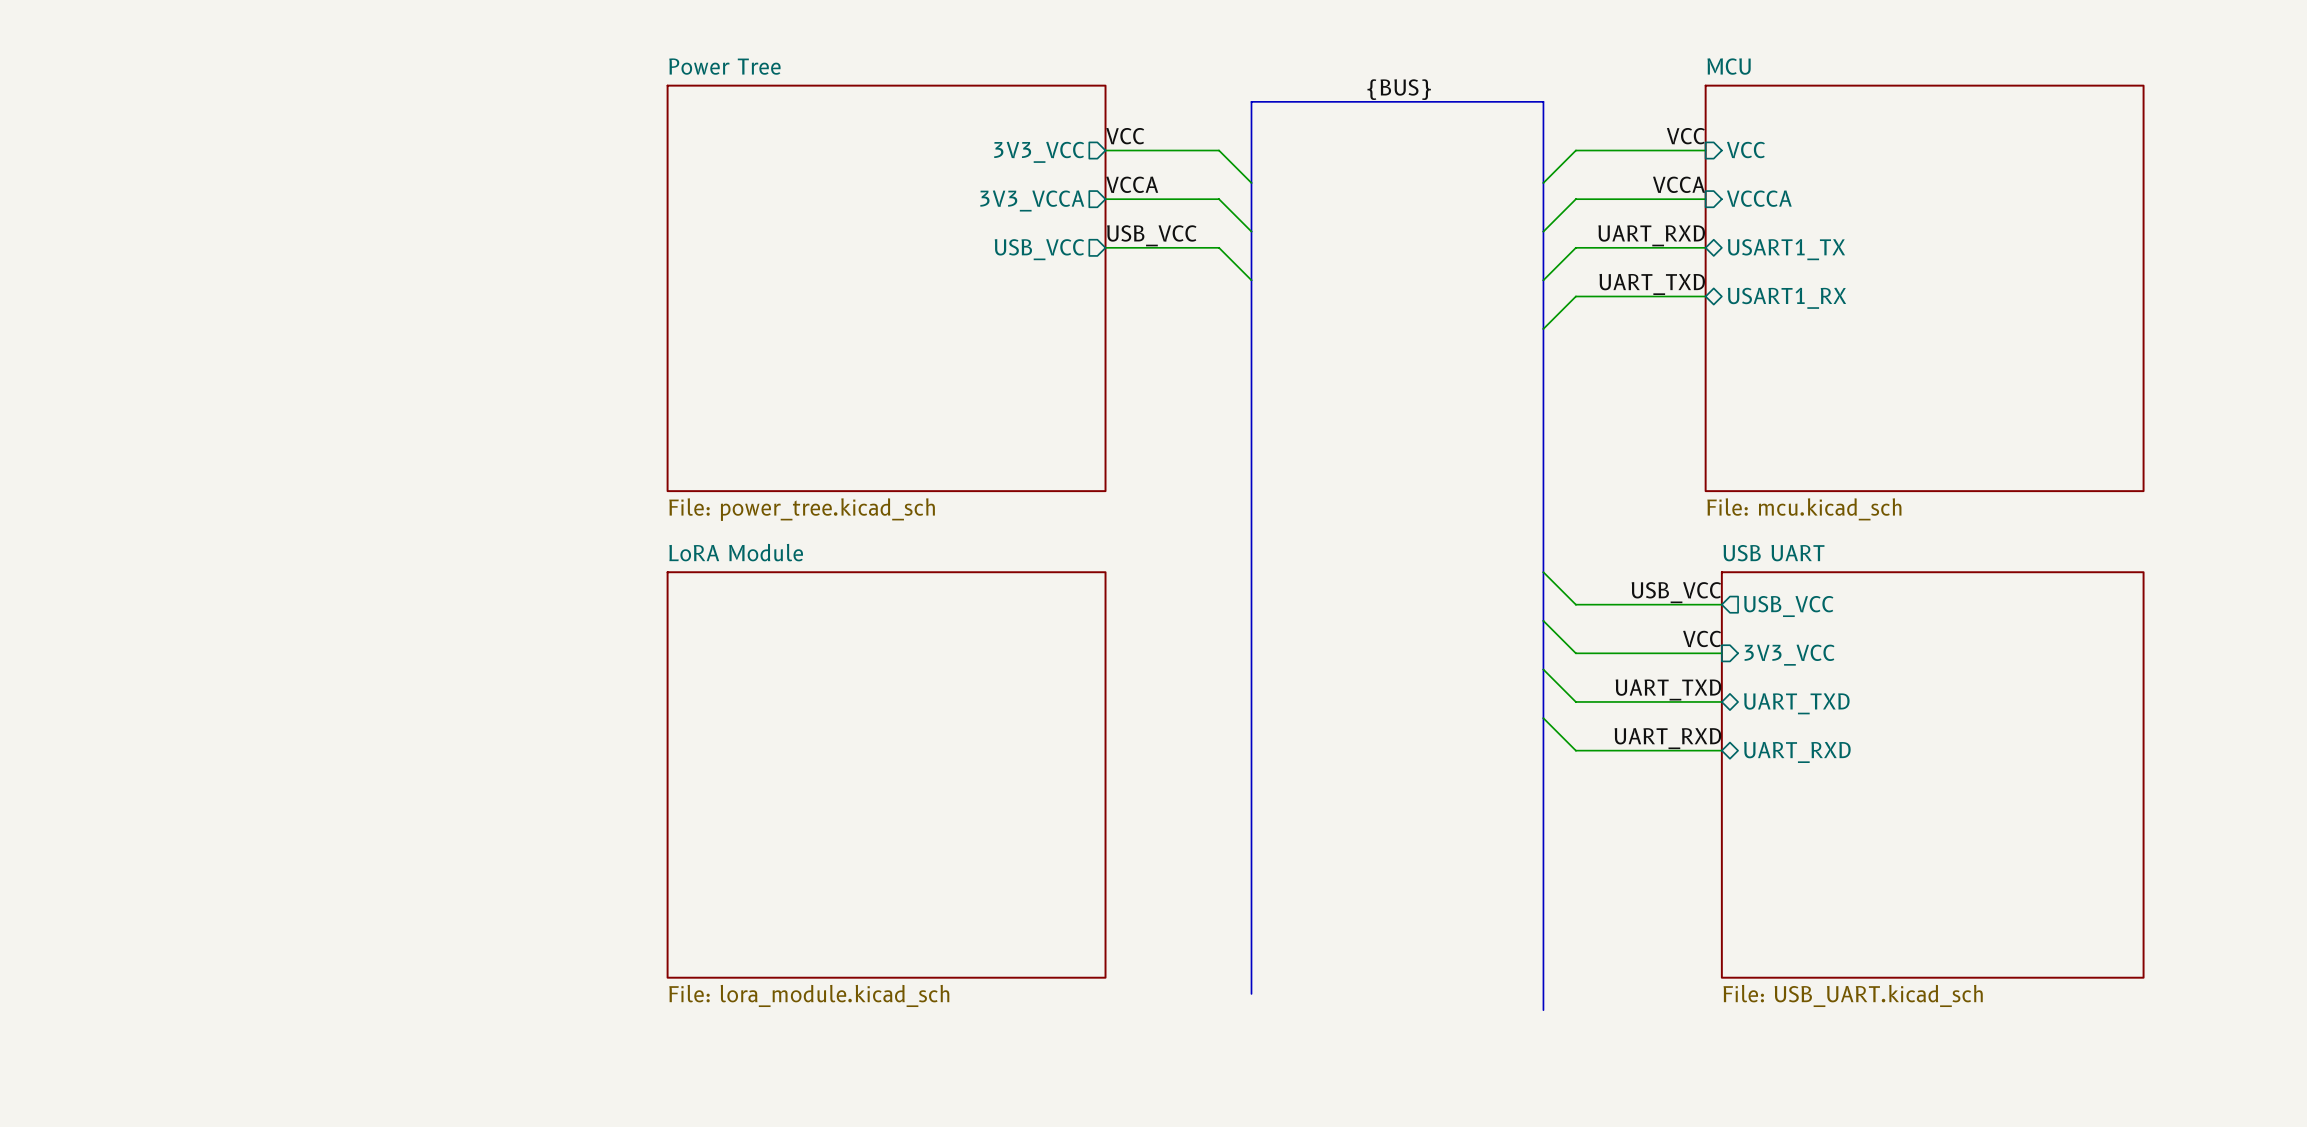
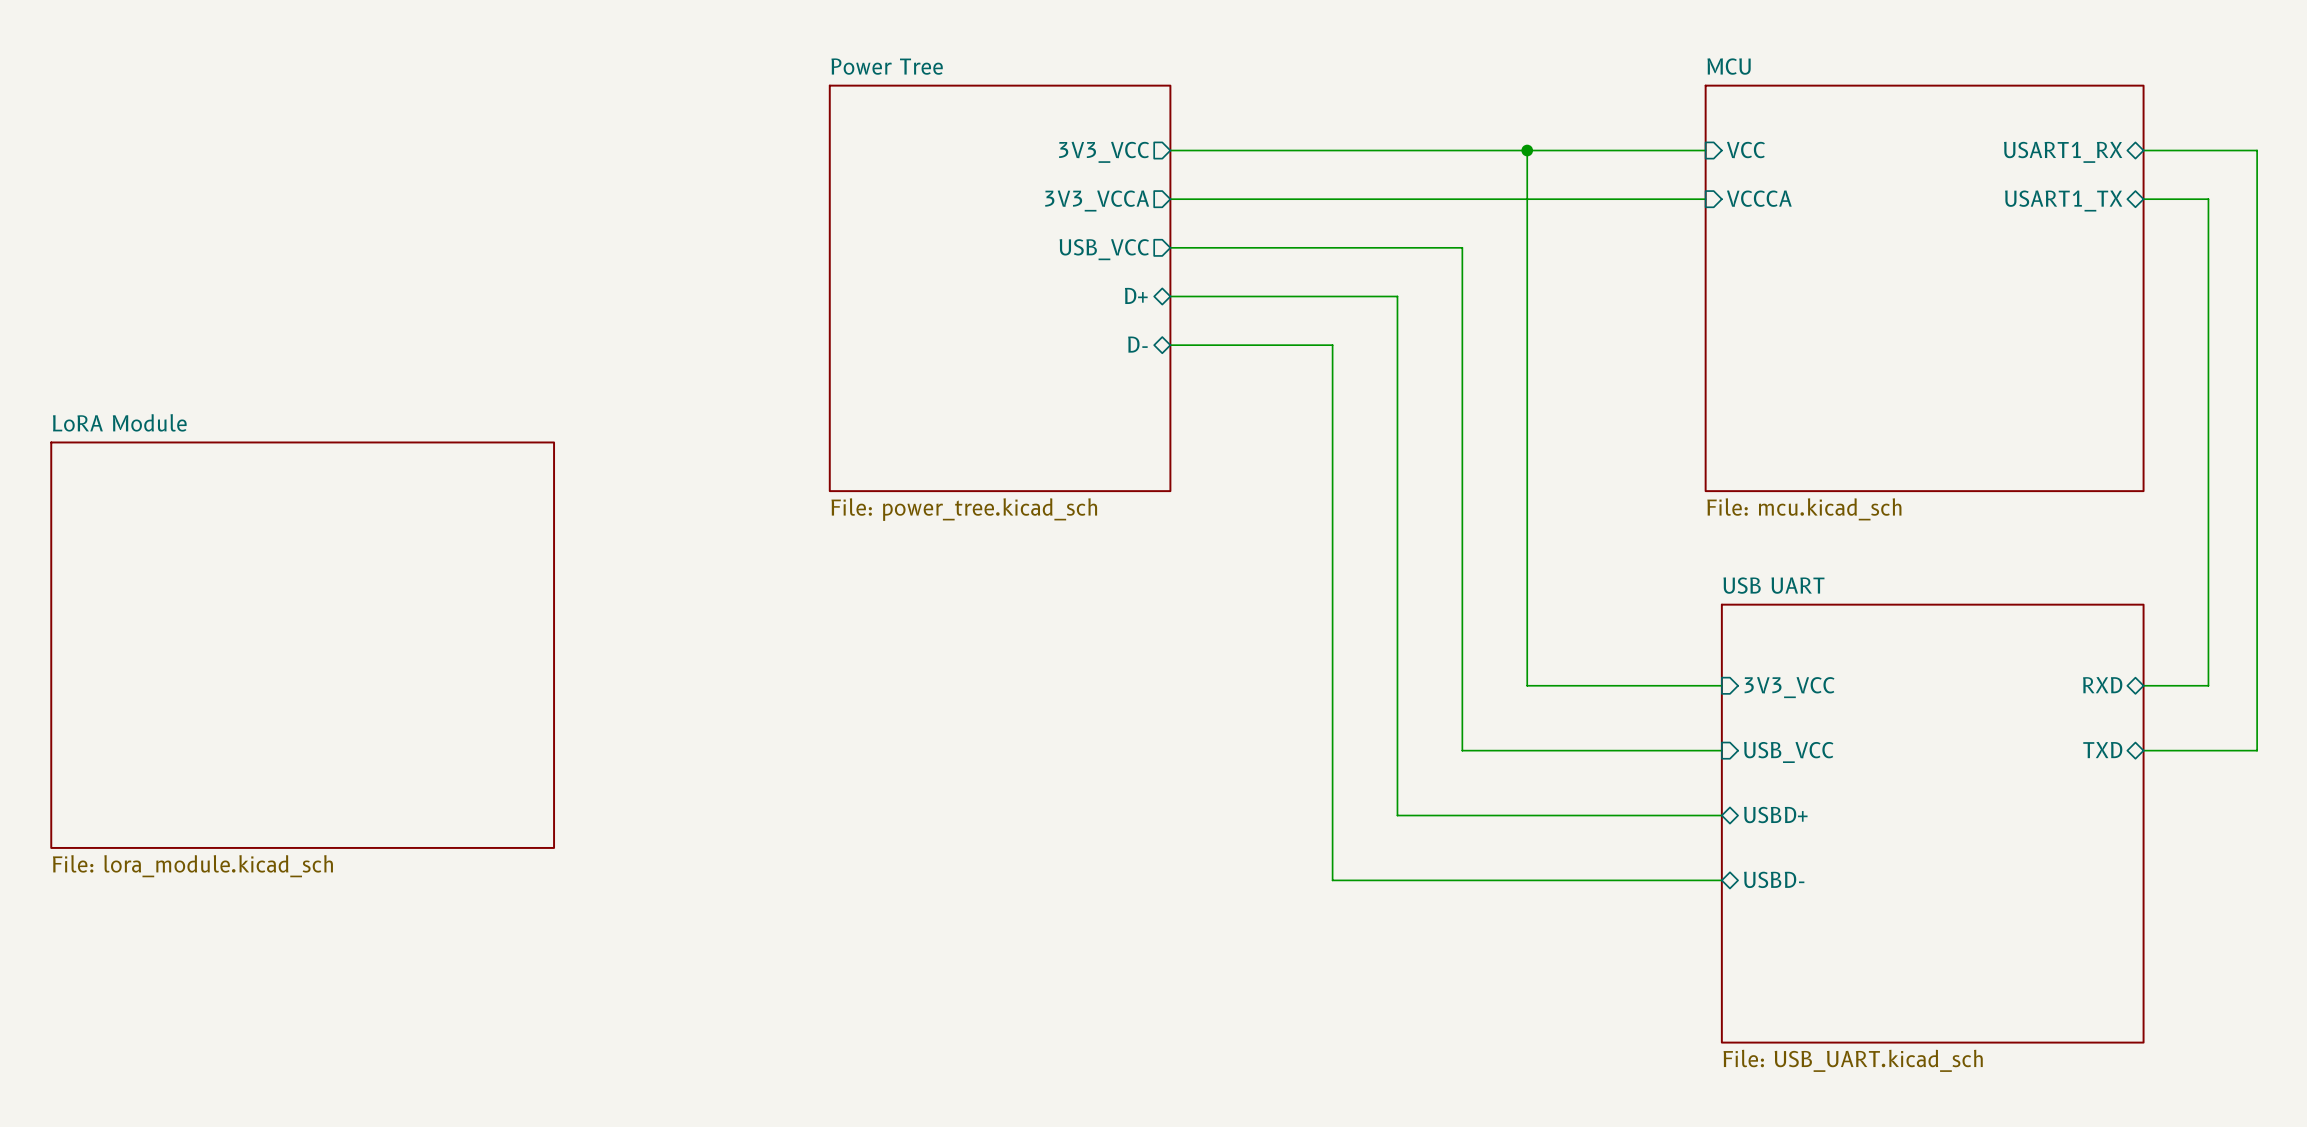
label: {BUS} (1399, 89) -> none
label: VCC (1125, 136) -> none
label: VCC (1685, 136) -> none
wire: (1105, 150) (1170, 150) -> none
wire: (1219, 150) (1251, 182) -> none
wire: none -> (1527, 150) (1527, 685) (1721, 685)
junction: none -> (1527, 150)
wire: (1575, 150) (1543, 182) -> (1575, 150) (1219, 150)
wire: none -> (2143, 150) (2257, 150) (2257, 750) (2143, 750)
sheet pin position: 3V3_VCC (1039, 152) -> 3V3_VCC (1104, 152)
sheet pin: none -> USART1_RX (2063, 152)
label: VCCA (1132, 184) -> none
label: VCCA (1678, 184) -> none
wire: (1105, 199) (1170, 199) -> none
wire: (1219, 199) (1251, 231) -> none
wire: (1575, 199) (1543, 231) -> (1575, 199) (1219, 199)
wire: none -> (2143, 199) (2208, 199) (2208, 685) (2143, 685)
sheet pin position: 3V3_VCCA (1032, 200) -> 3V3_VCCA (1097, 200)
sheet pin: none -> USART1_TX (2063, 200)
label: USB_VCC (1151, 235) -> none
label: UART_RXD (1651, 235) -> none
wire: (1105, 247) (1170, 247) -> none
wire: (1219, 247) (1251, 280) -> (1219, 247) (1462, 247) (1462, 750) (1575, 750)
wire: (1705, 247) (1575, 247) (1543, 280) -> none
sheet pin position: USB_VCC (1039, 249) -> USB_VCC (1104, 249)
sheet pin: USART1_TX (1786, 249) -> none
label: UART_TXD (1652, 284) -> none
sheet Power Tree: File: power_tree.kicad_sch (886, 288) -> none
sheet Power Tree: none -> File: power_tree.kicad_sch (1000, 288)
sheet pin: none -> D+ (1136, 295)
wire: none -> (1170, 296) (1397, 296) (1397, 815) (1721, 815)
wire: (1705, 296) (1575, 296) (1543, 328) -> none
sheet pin: USART1_RX (1786, 298) -> none
sheet pin: none -> D- (1137, 344)
wire: none -> (1170, 345) (1332, 345) (1332, 880) (1721, 880)
wire: (1543, 572) (1575, 604) (1721, 604) -> none
label: USB_VCC (1676, 592) -> none
sheet pin: USB_VCC (1788, 606) -> none
wire: (1543, 620) (1575, 653) (1721, 653) -> none
label: VCC (1702, 638) -> none
sheet LoRA Module: none -> File: lora_module.kicad_sch (302, 645)
sheet pin position: 3V3_VCC (1789, 655) -> 3V3_VCC (1789, 687)
wire: (1543, 669) (1575, 701) (1721, 701) -> none
sheet pin: none -> RXD (2102, 685)
label: UART_TXD (1668, 689) -> none
sheet pin: UART_TXD (1796, 703) -> none
wire: (1543, 718) (1575, 750) -> none
label: UART_RXD (1667, 738) -> none
sheet pin: none -> TXD (2102, 750)
sheet pin shape: bidirectional (1797, 752) -> input (1788, 752)
sheet pin: UART_RXD (1797, 752) -> USB_VCC (1788, 752)
sheet LoRA Module: File: lora_module.kicad_sch (886, 774) -> none
sheet USB UART: File: USB_UART.kicad_sch (1932, 774) -> none
sheet pin: none -> USBD+ (1775, 815)
sheet USB UART: none -> File: USB_UART.kicad_sch (1932, 823)
sheet pin: none -> USBD- (1774, 879)
bus: (1251, 993) (1251, 101) (1543, 101) (1543, 1010) -> none

